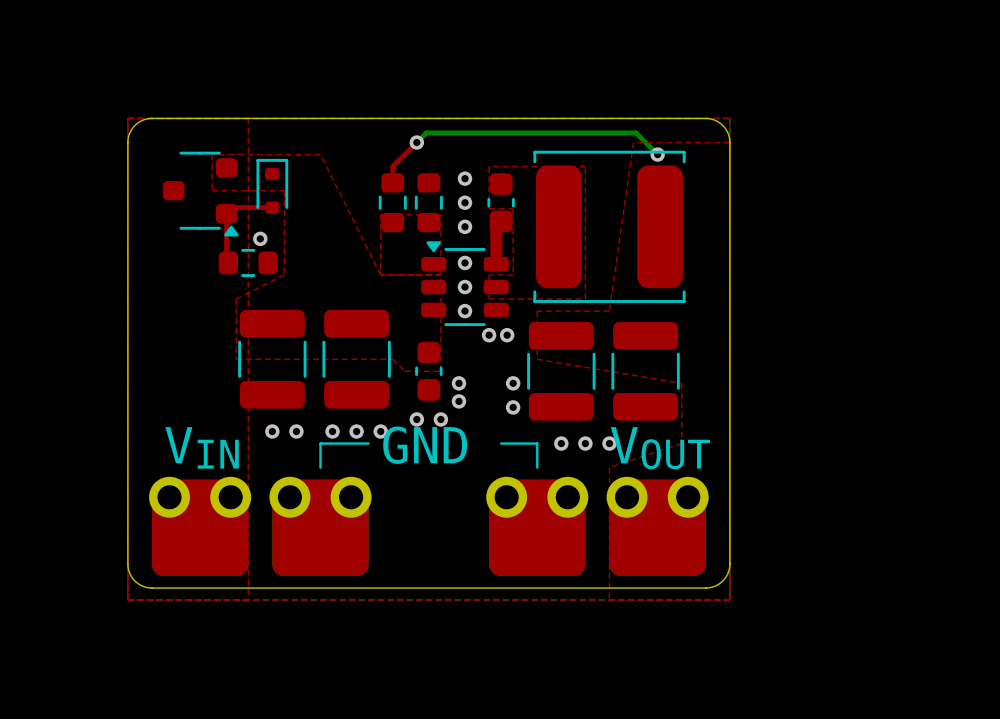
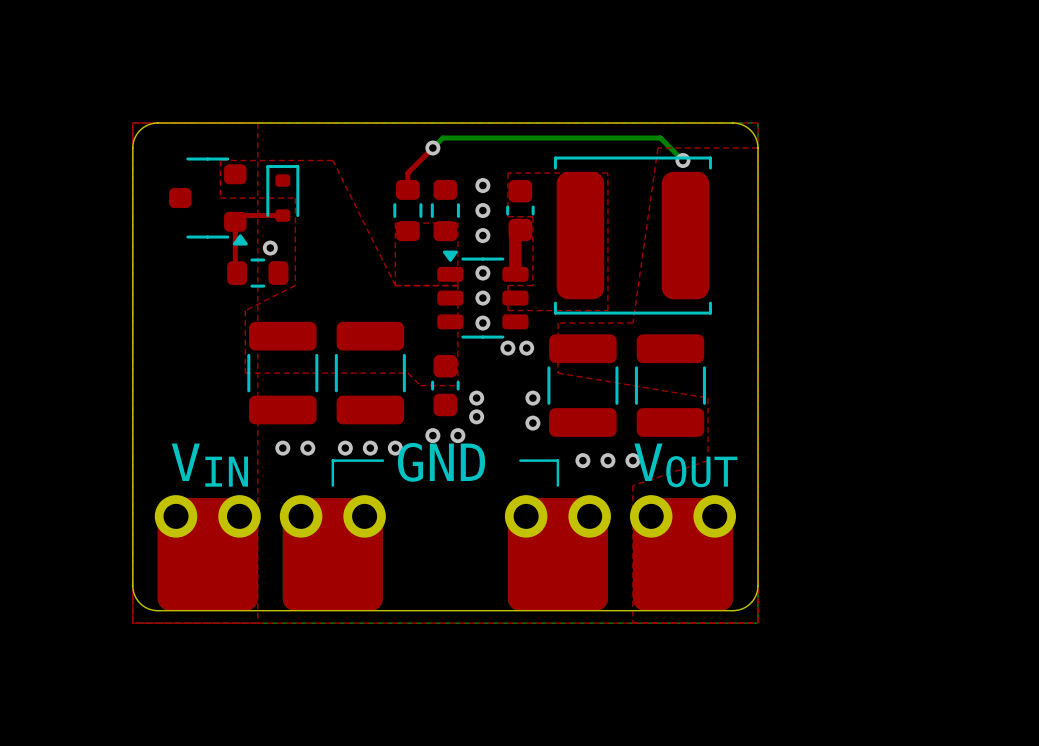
part footprint: [149, 476, 252, 577] -> [154, 495, 261, 611]
part footprint: [269, 476, 372, 577] -> [279, 495, 386, 611]
part footprint: [486, 476, 589, 577] -> [504, 495, 611, 611]
part footprint: [606, 476, 709, 577] -> [629, 495, 736, 611]

